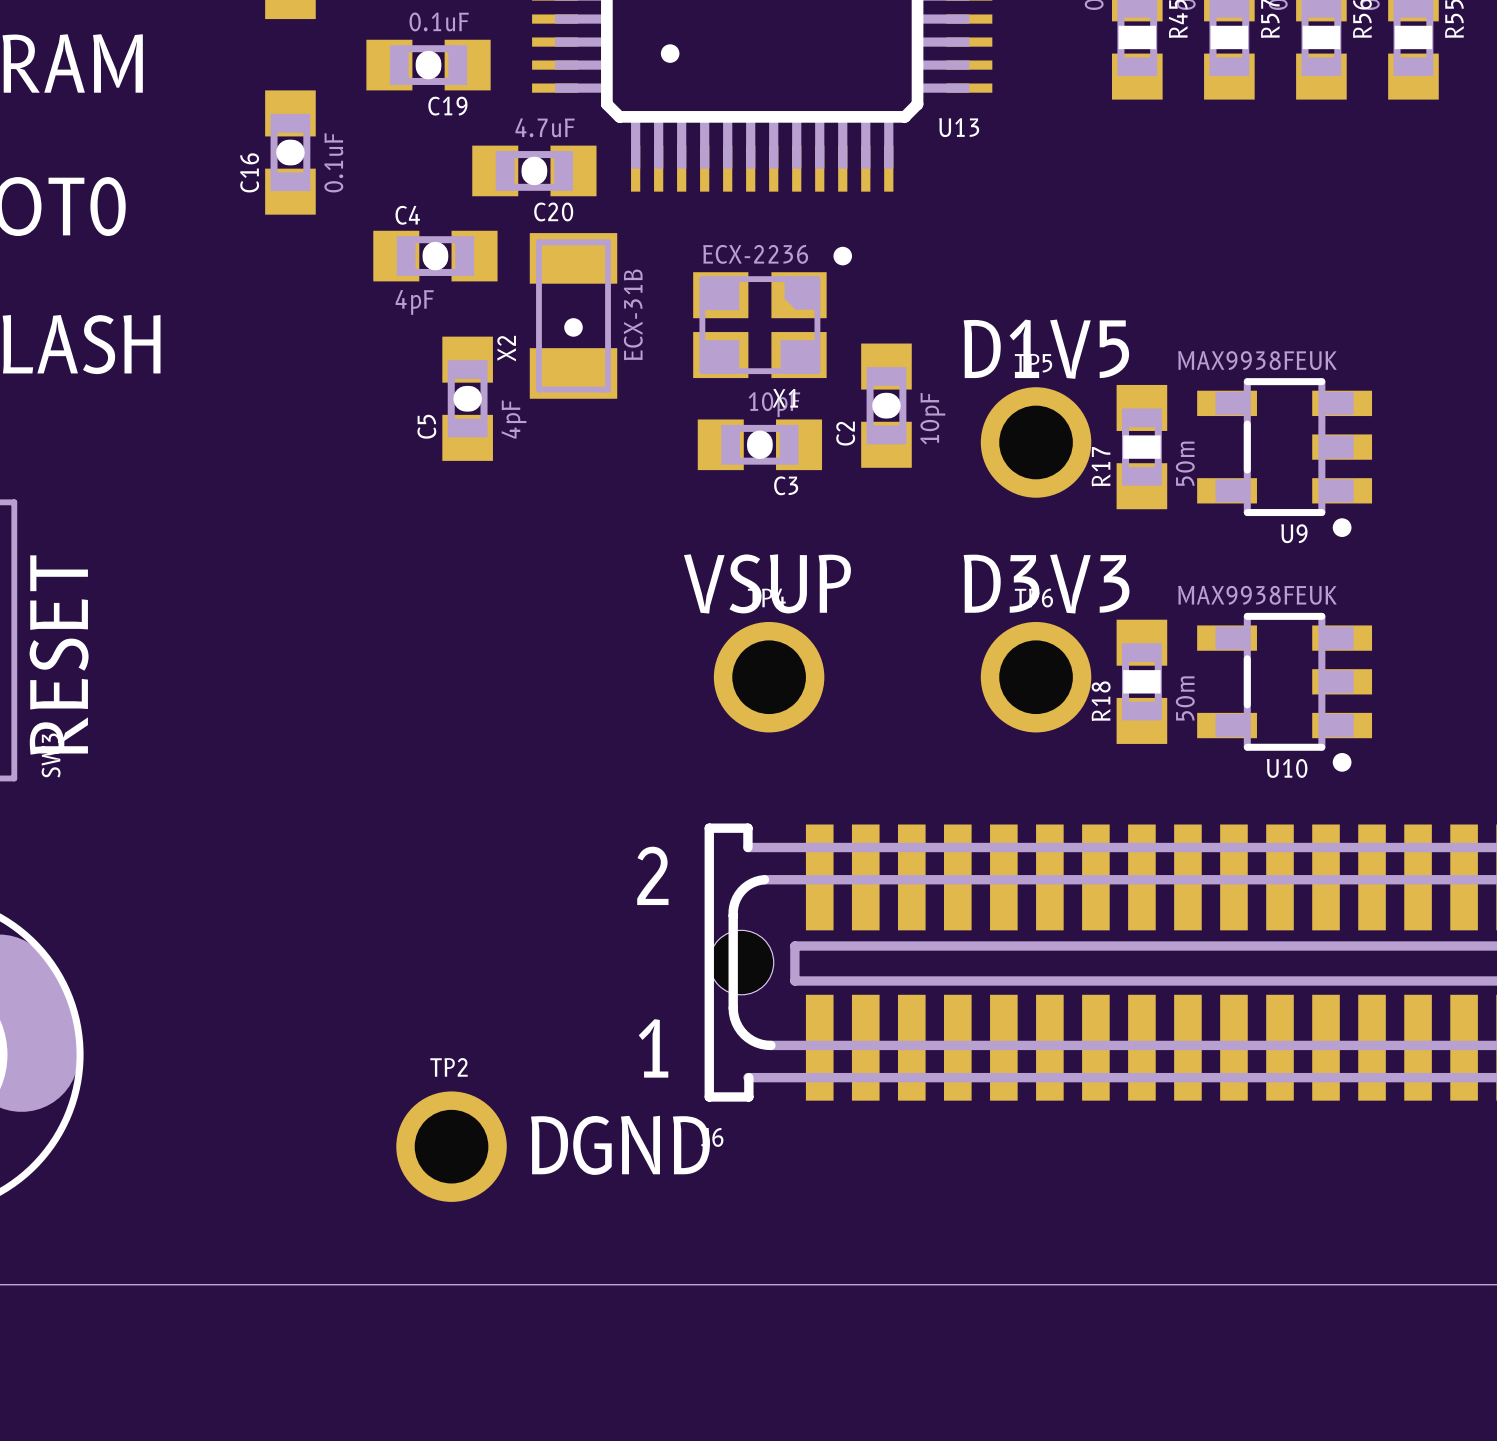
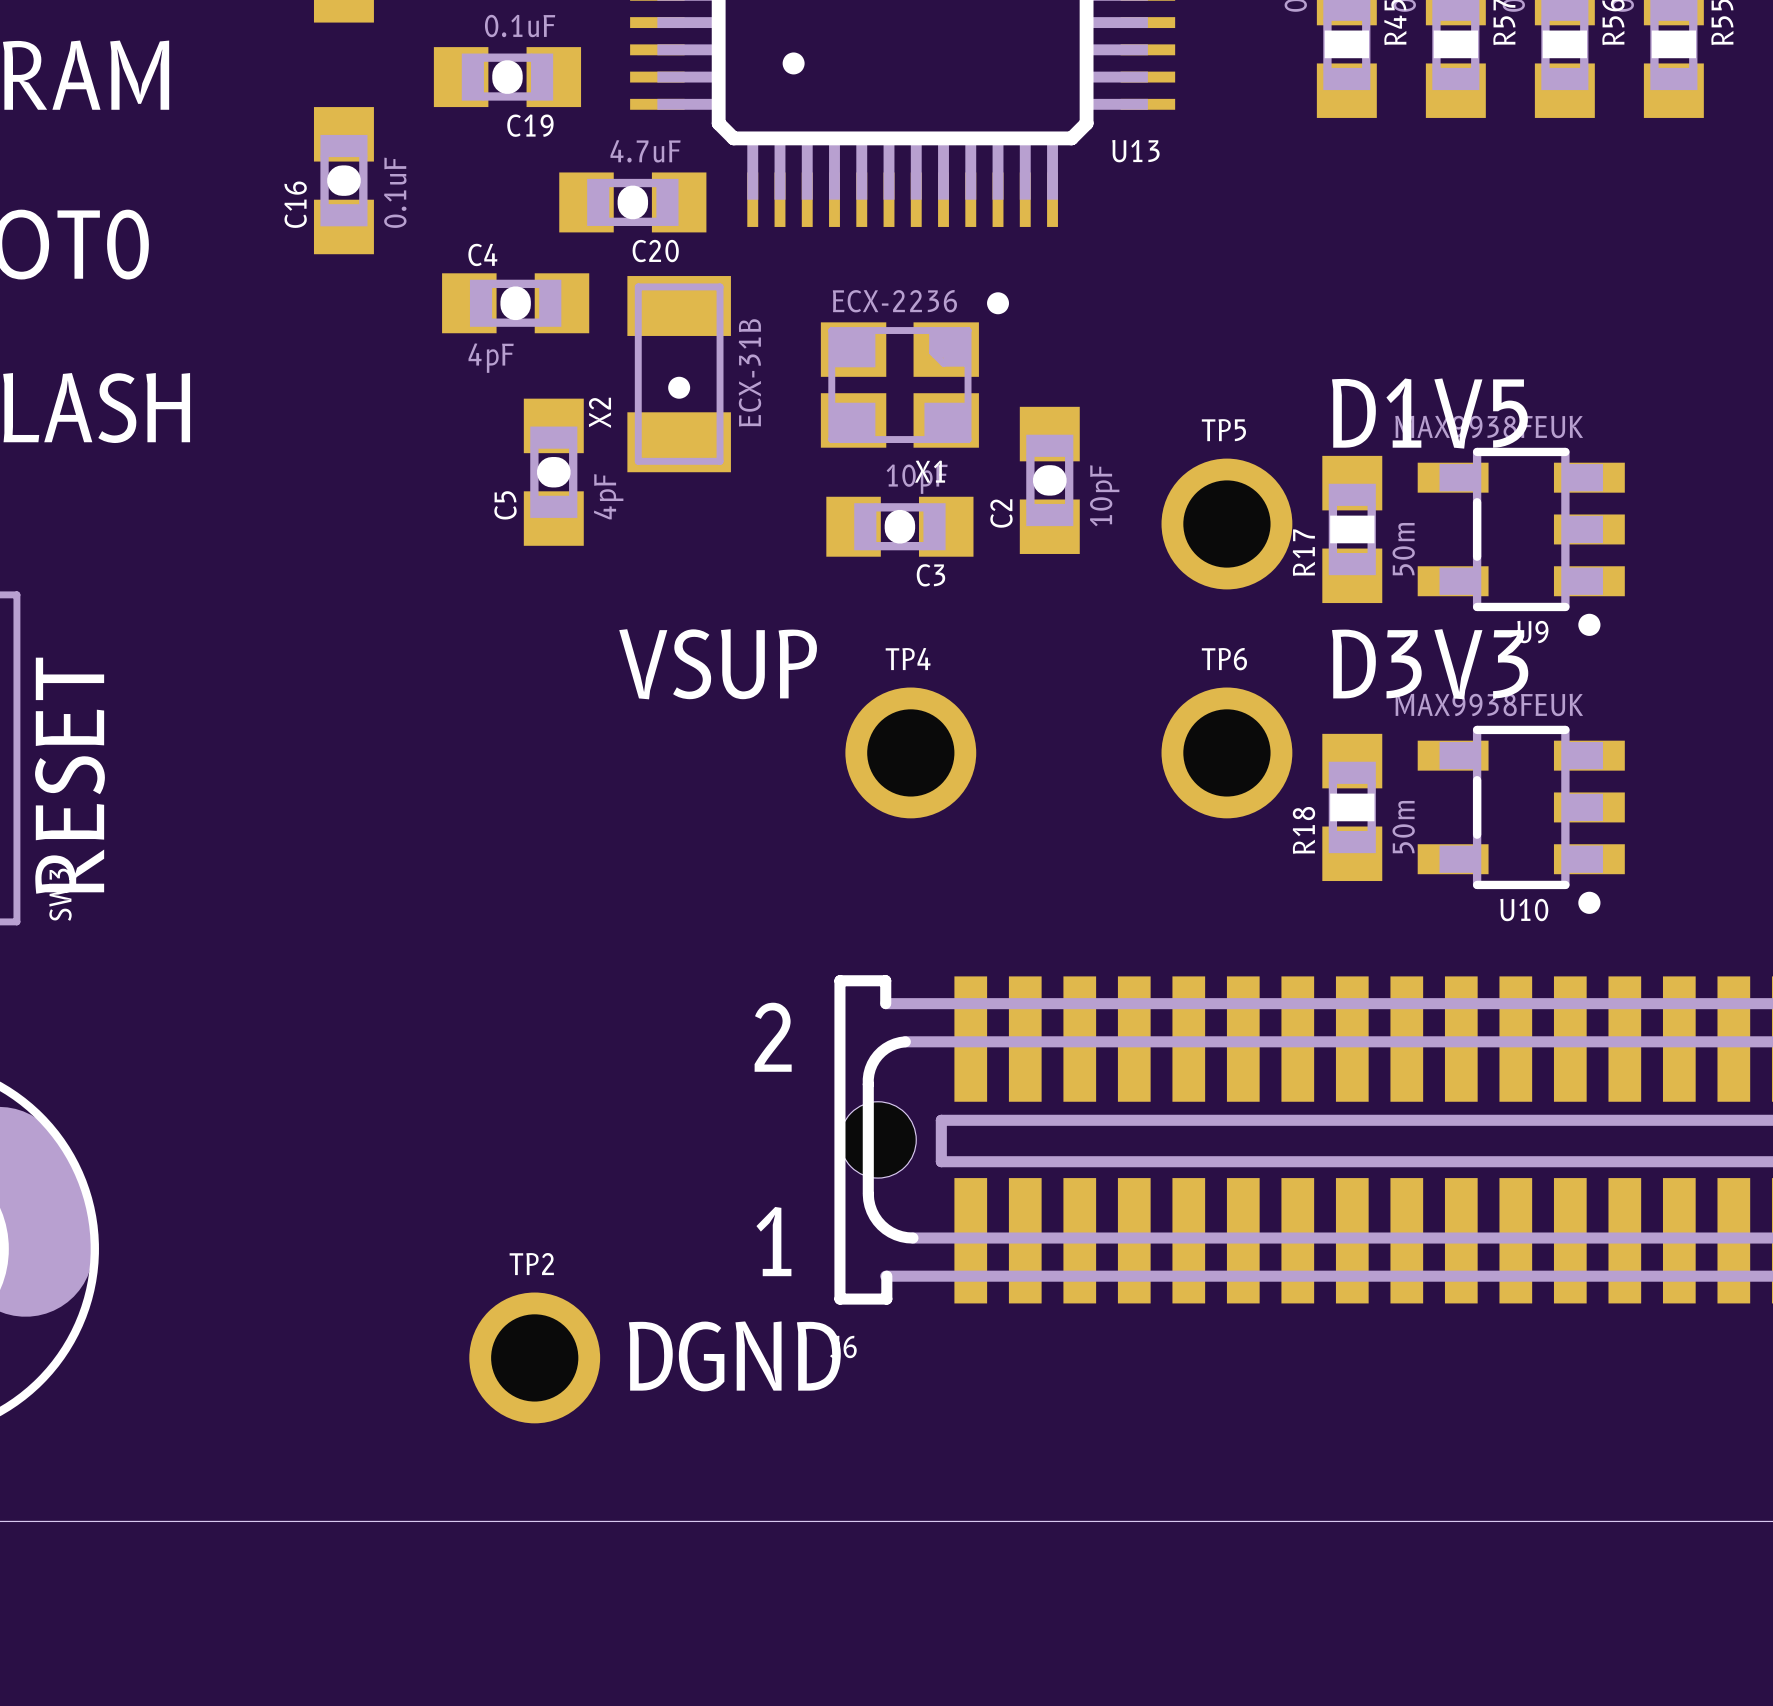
text position: D1V5 (1046, 349) -> D1V5 (1429, 413)
text position: VSUP (767, 583) -> VSUP (718, 664)
text position: D3V3 (1046, 583) -> D3V3 (1430, 664)
TP4 position: (769, 677) -> (910, 752)
TP6 position: (1036, 677) -> (1226, 752)

